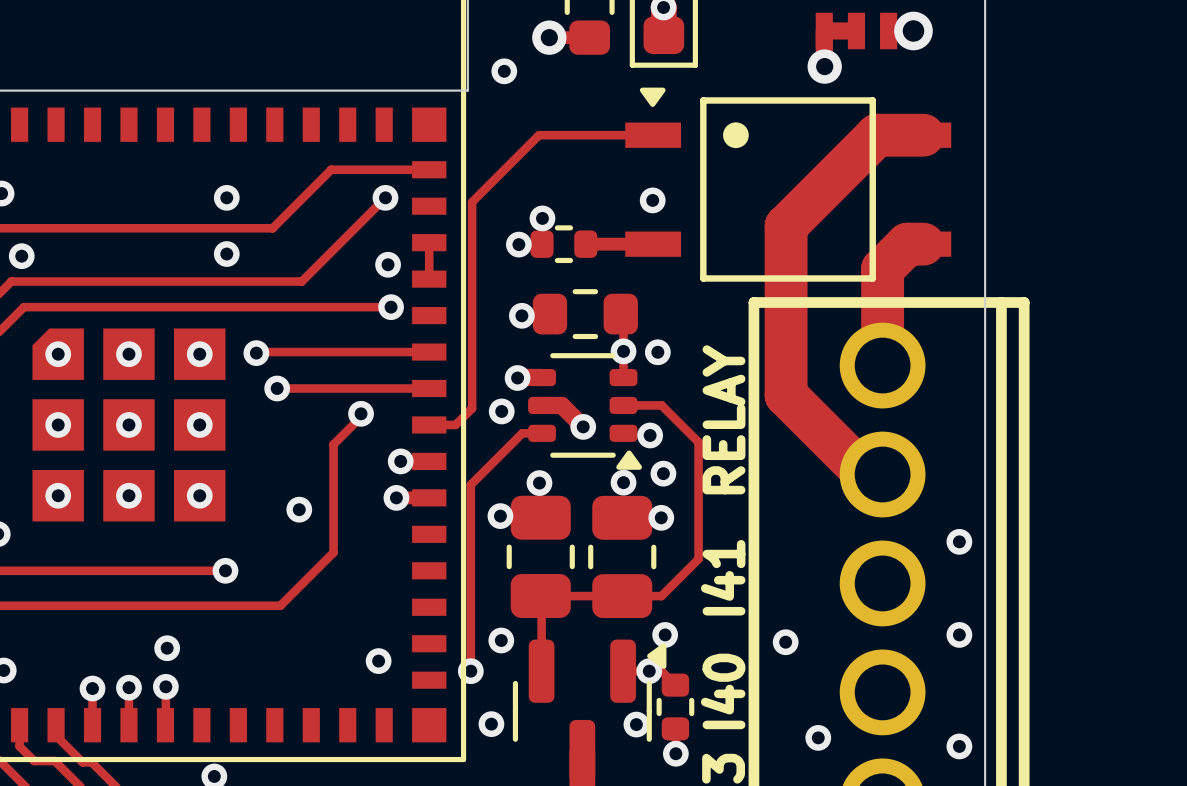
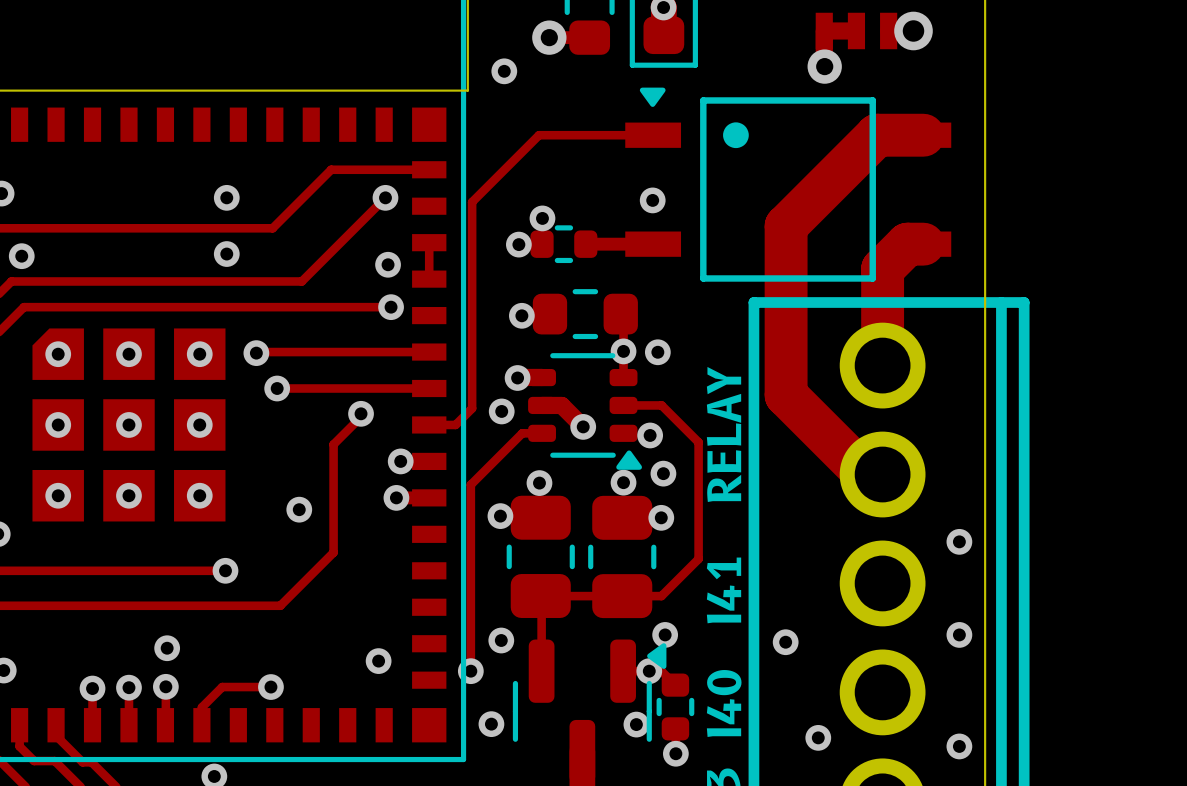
track: none -> (270, 687) (222, 687) (201, 707) (201, 725)
via: none -> (270, 687)

